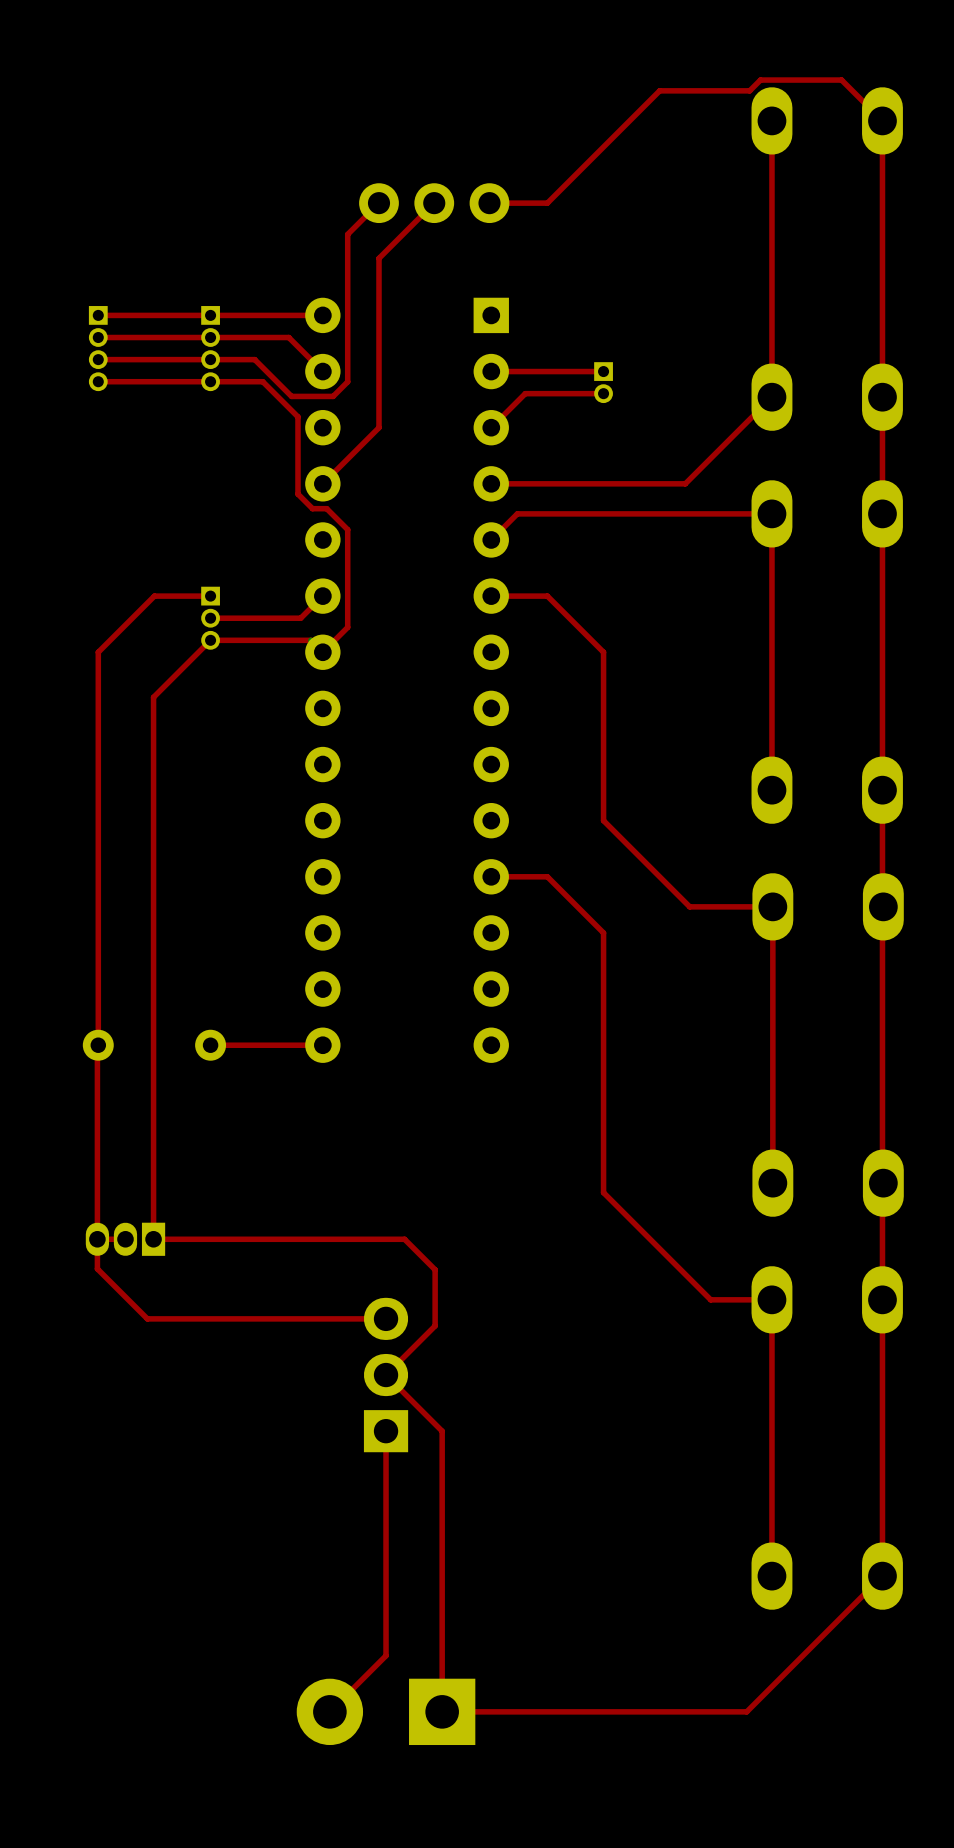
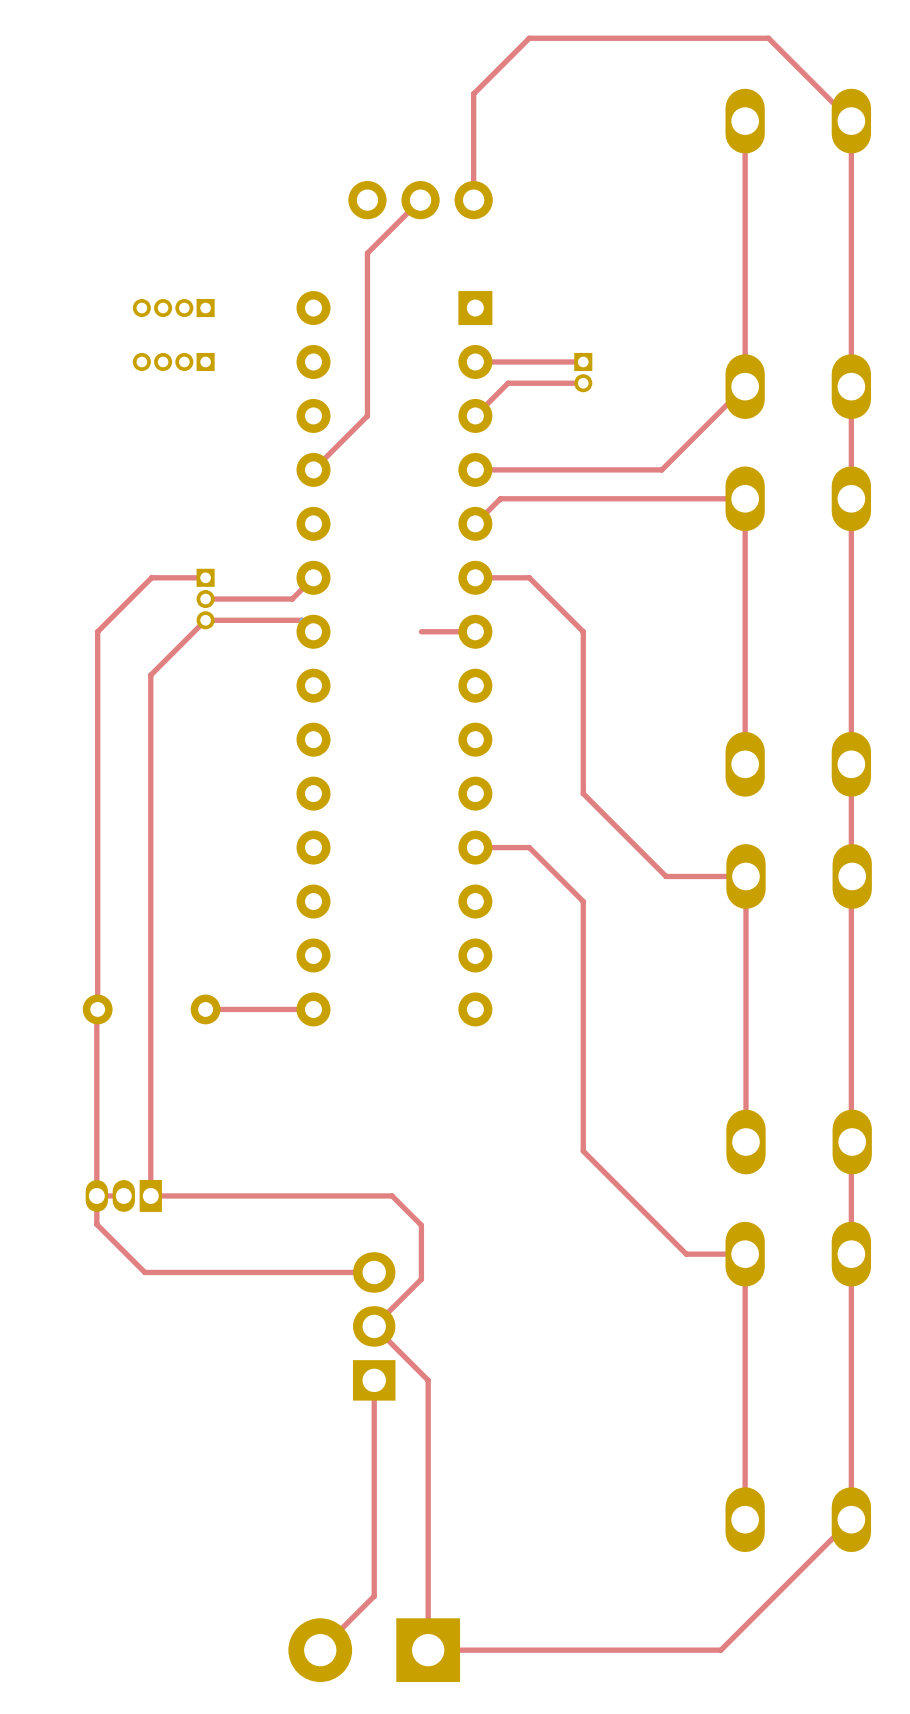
top track: (841, 80) (760, 80) (749, 90) (659, 90) (547, 203) (489, 203) -> (812, 81) (768, 38) (529, 38) (473, 93) (473, 200)
top track: (378, 203) (347, 234) (347, 381) (333, 396) (291, 396) (254, 359) (98, 359) -> none
part: none -> (173, 308)
top track: (322, 315) (98, 315) -> none
top track: (98, 337) (288, 337) (322, 371) -> none
part: (98, 348) -> none
part: (210, 348) -> none
part: none -> (173, 361)
top track: (98, 381) (262, 381) (297, 416) (297, 494) (312, 508) (326, 508) (347, 529) (347, 627) (322, 652) -> none
top track: none -> (475, 631) (421, 631)

